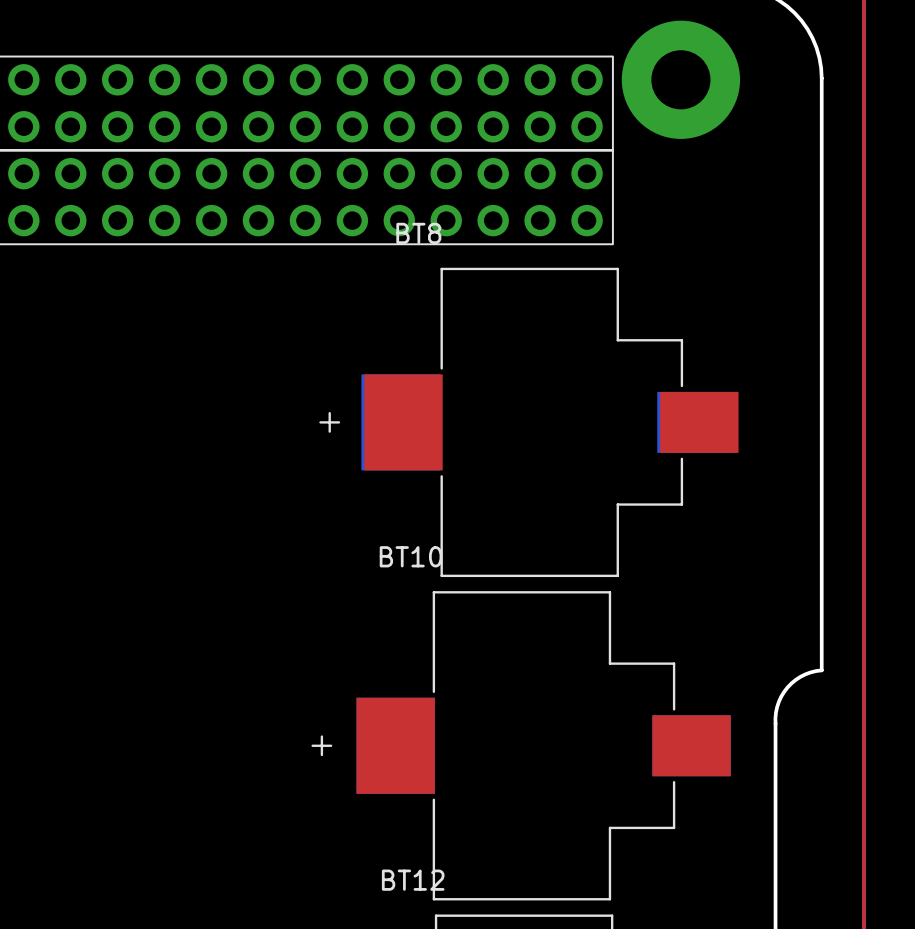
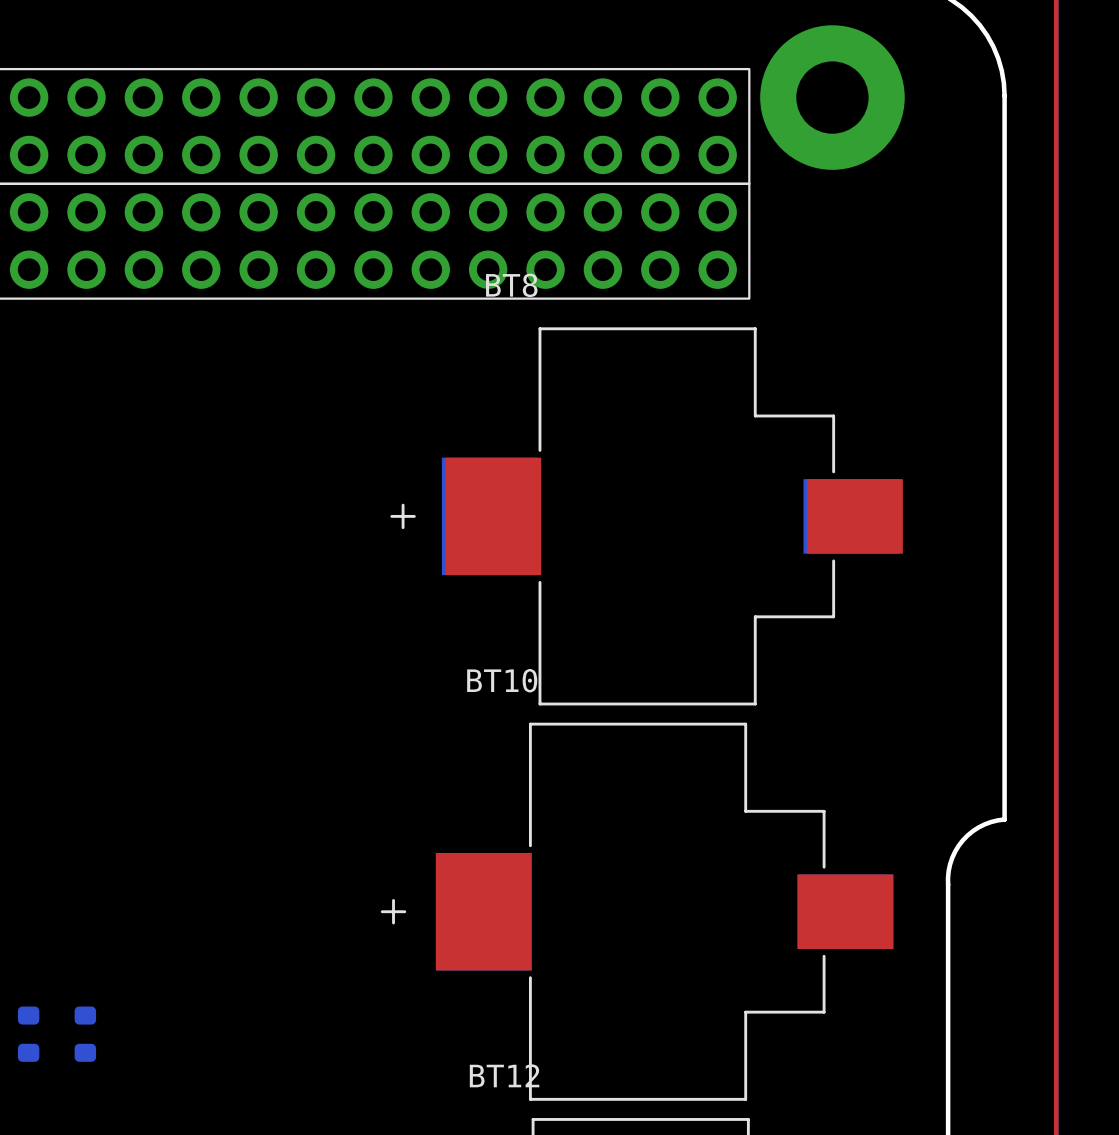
part: none -> (28, 1034)
part: none -> (85, 1034)

